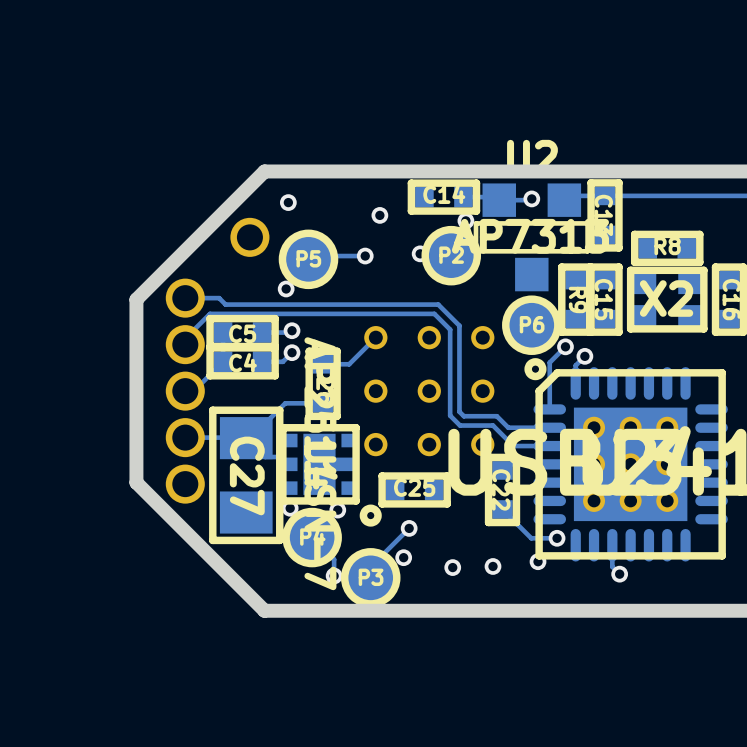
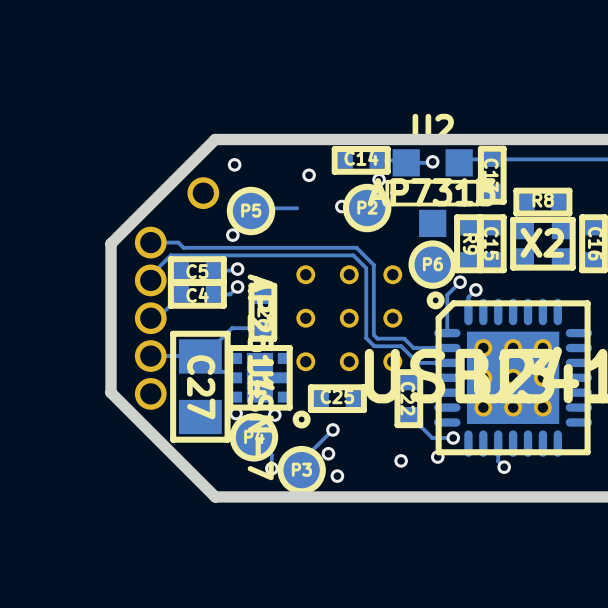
via: (365, 256) -> none
track: (375, 337) (349, 364) (323, 364) -> none
via position: (452, 567) -> (337, 476)

